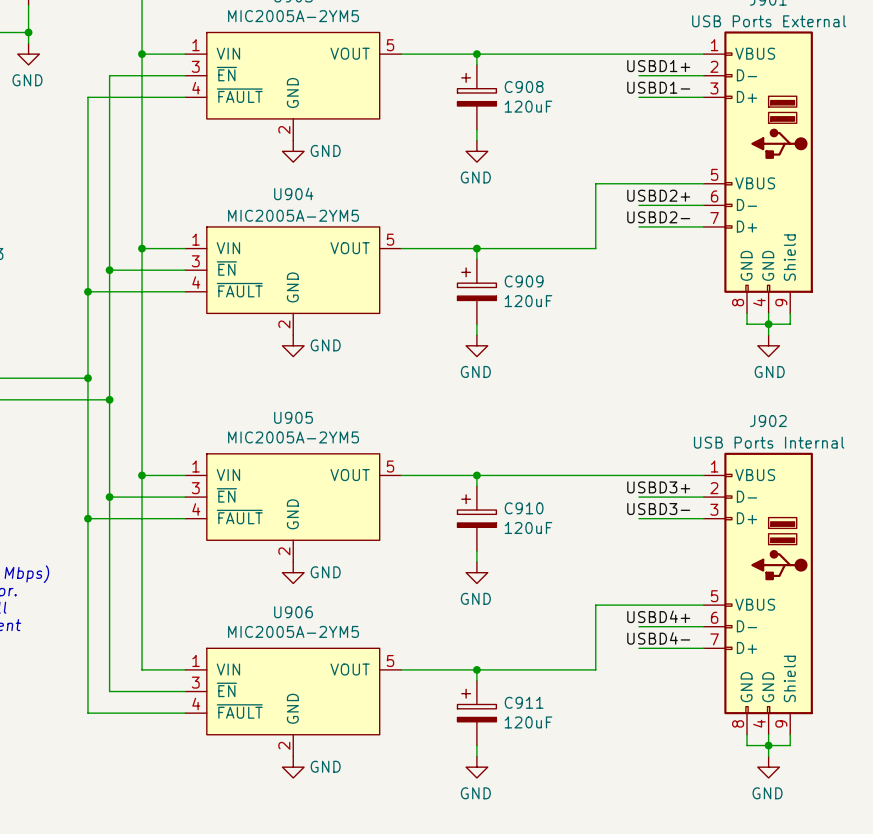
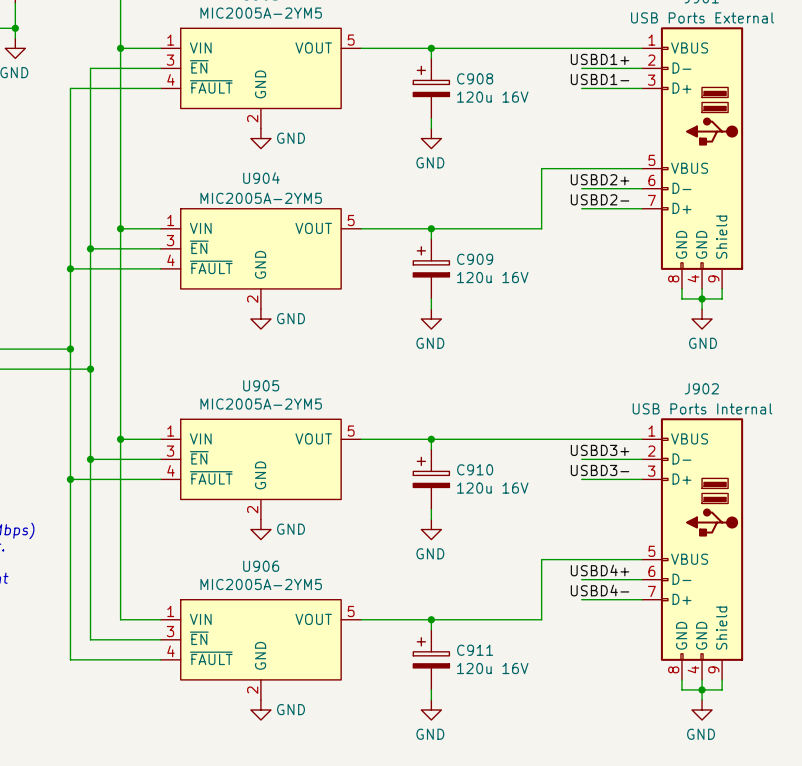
C908 value: 120uF (528, 106) -> 120u 16V (492, 97)
C909 value: 120uF (528, 301) -> 120u 16V (492, 277)
C910 value: 120uF (528, 527) -> 120u 16V (492, 488)
C911 value: 120uF (528, 722) -> 120u 16V (492, 668)

